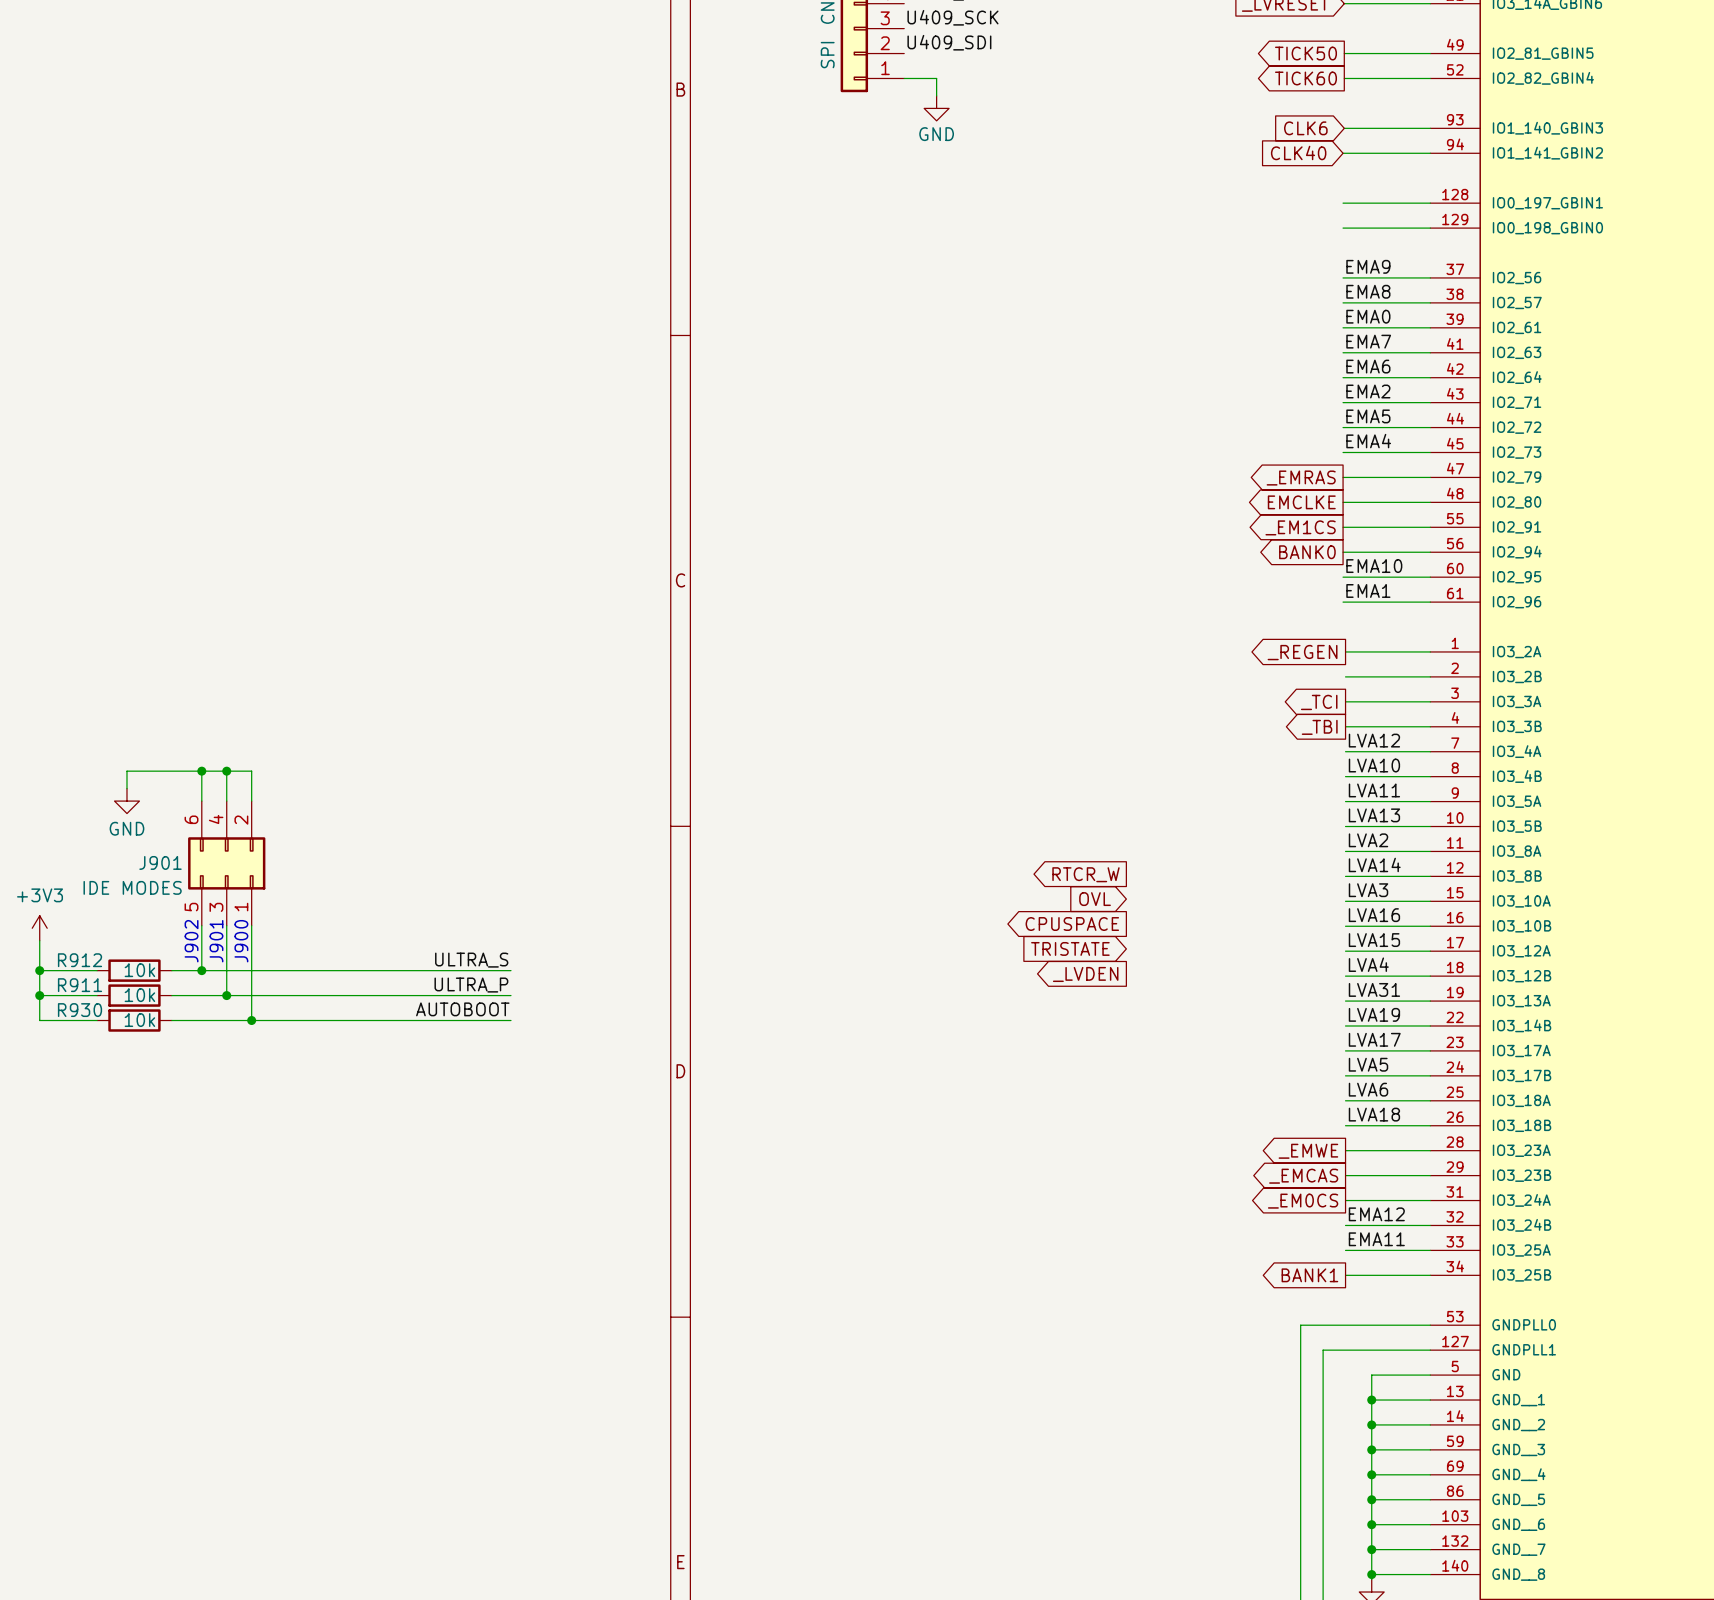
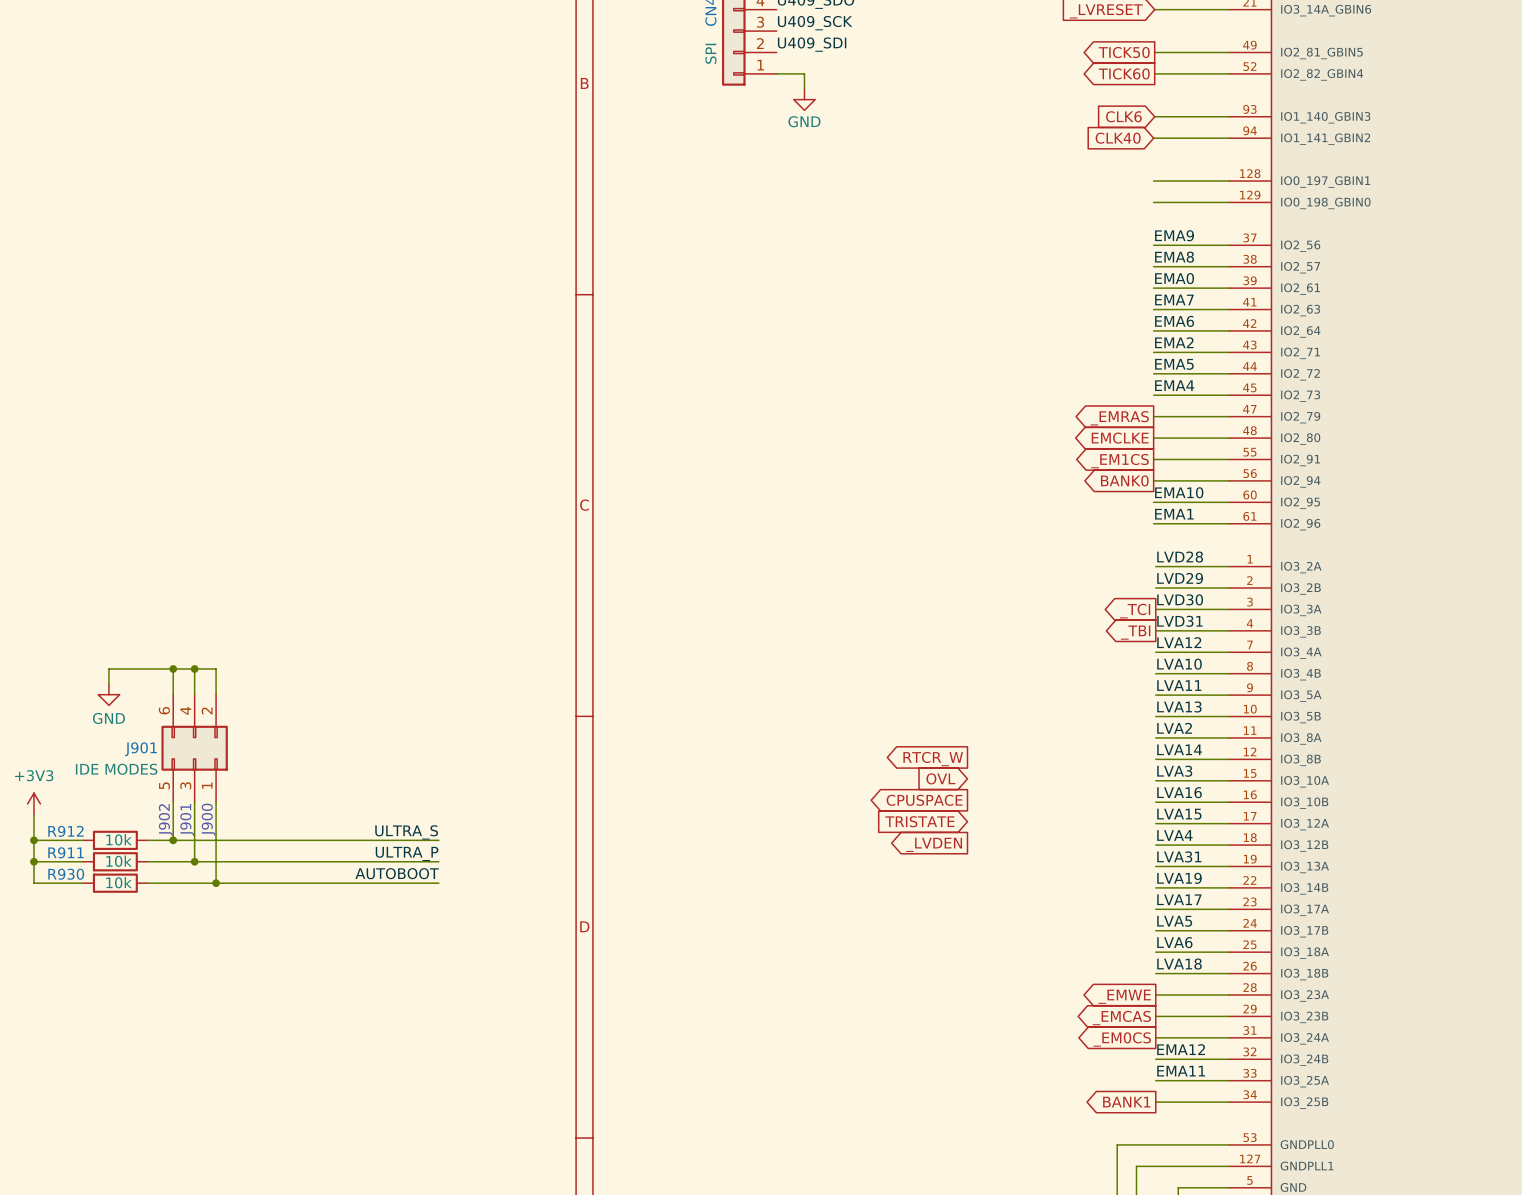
label: none -> LVD28 (1180, 557)
global label: _REGEN (1302, 652) -> none
label: none -> LVD29 (1180, 578)
label: none -> LVD30 (1180, 599)
label: none -> LVD31 (1179, 621)

